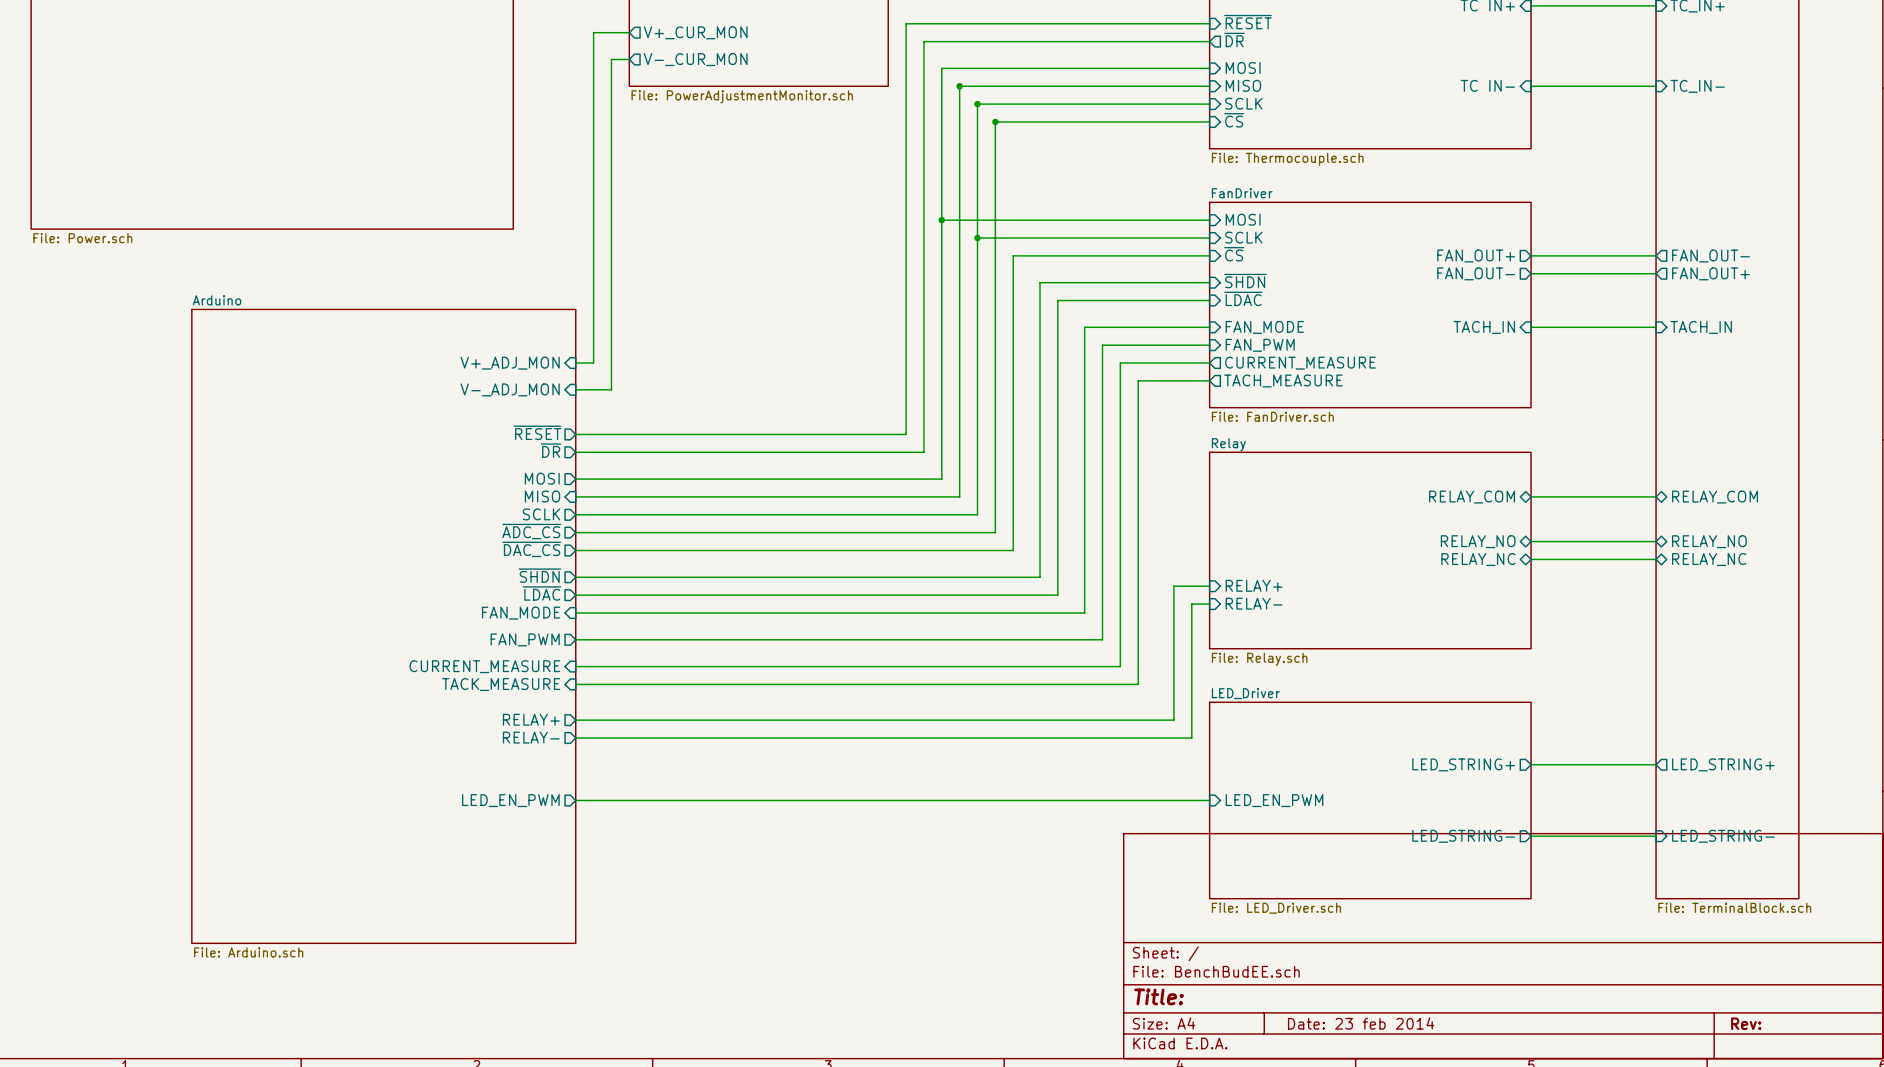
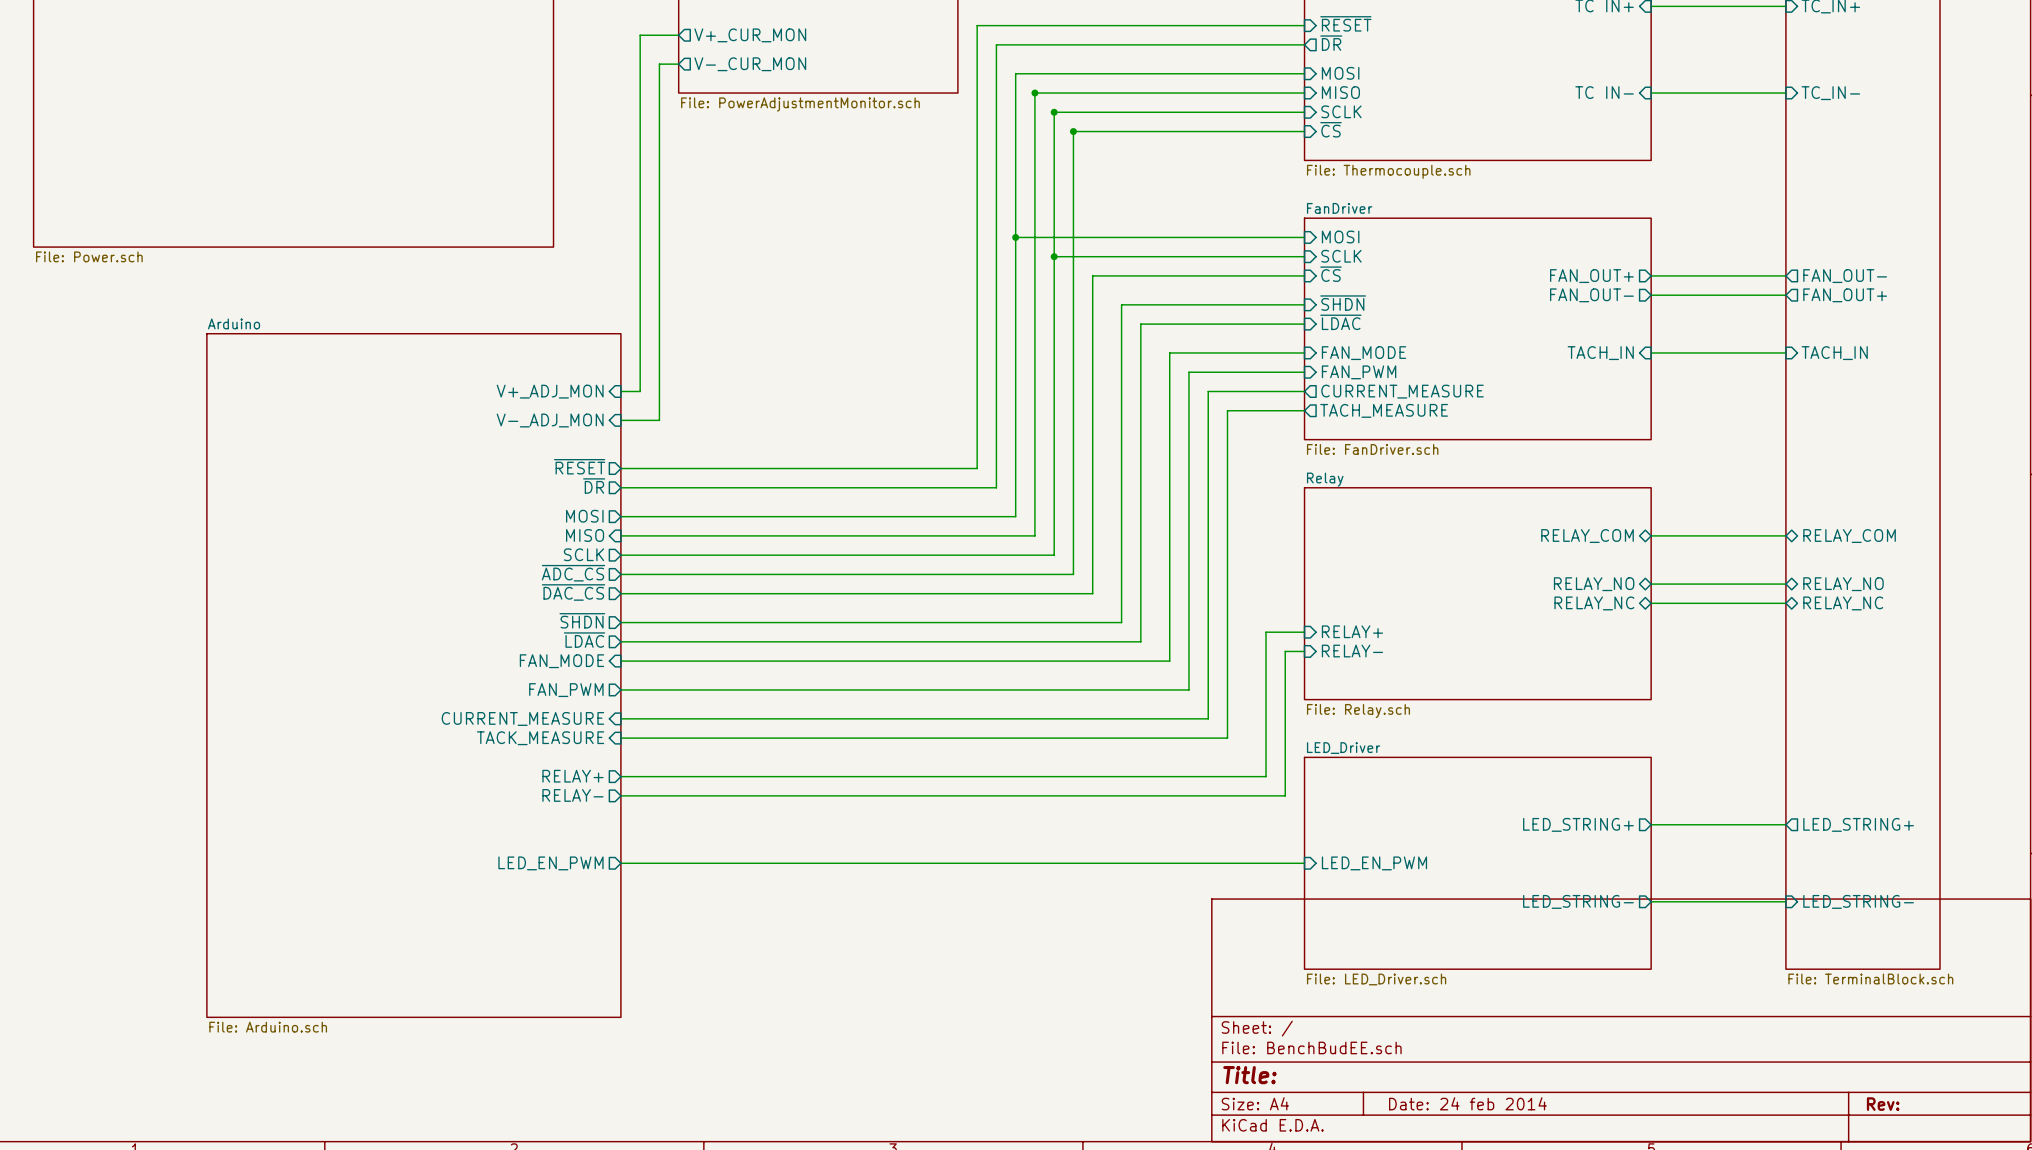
title block: Date: 23 feb 2014 (1361, 1023) -> Date: 24 feb 2014 (1467, 1103)

